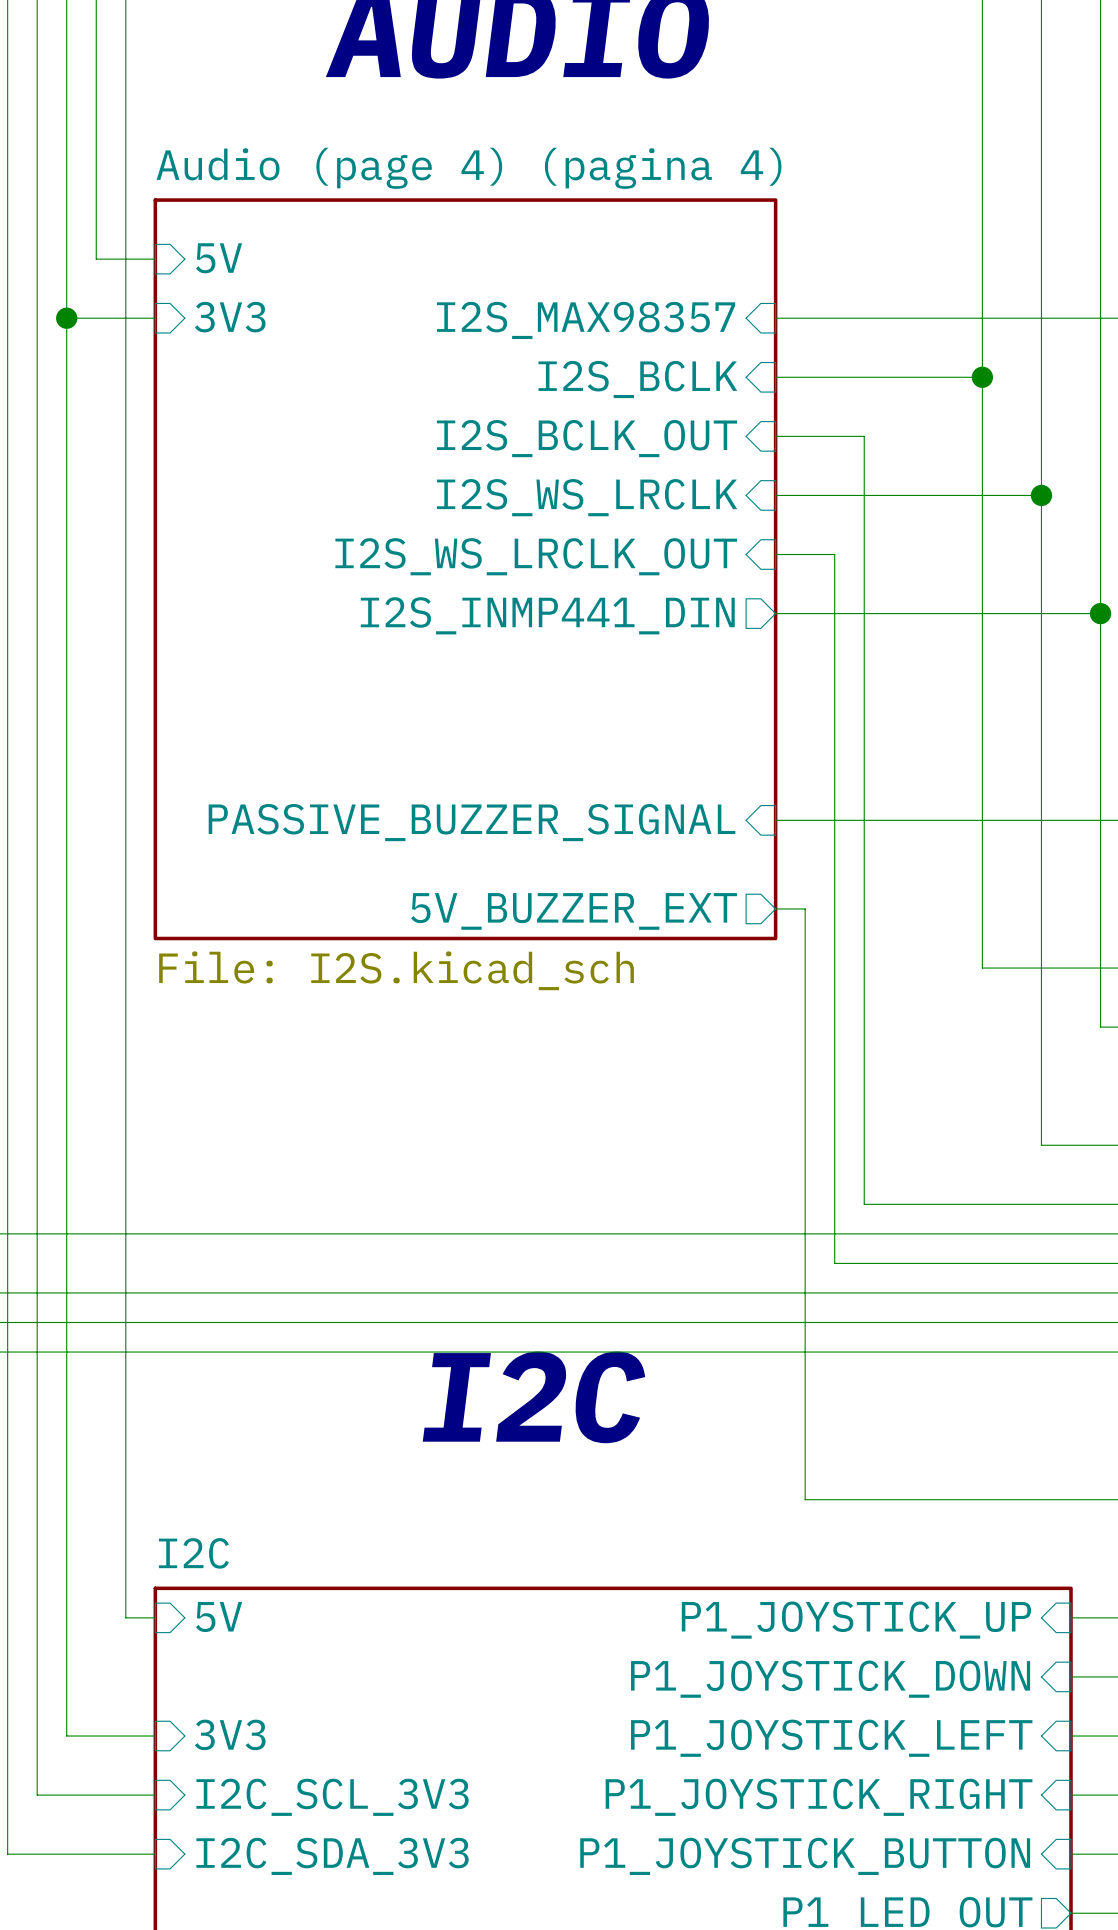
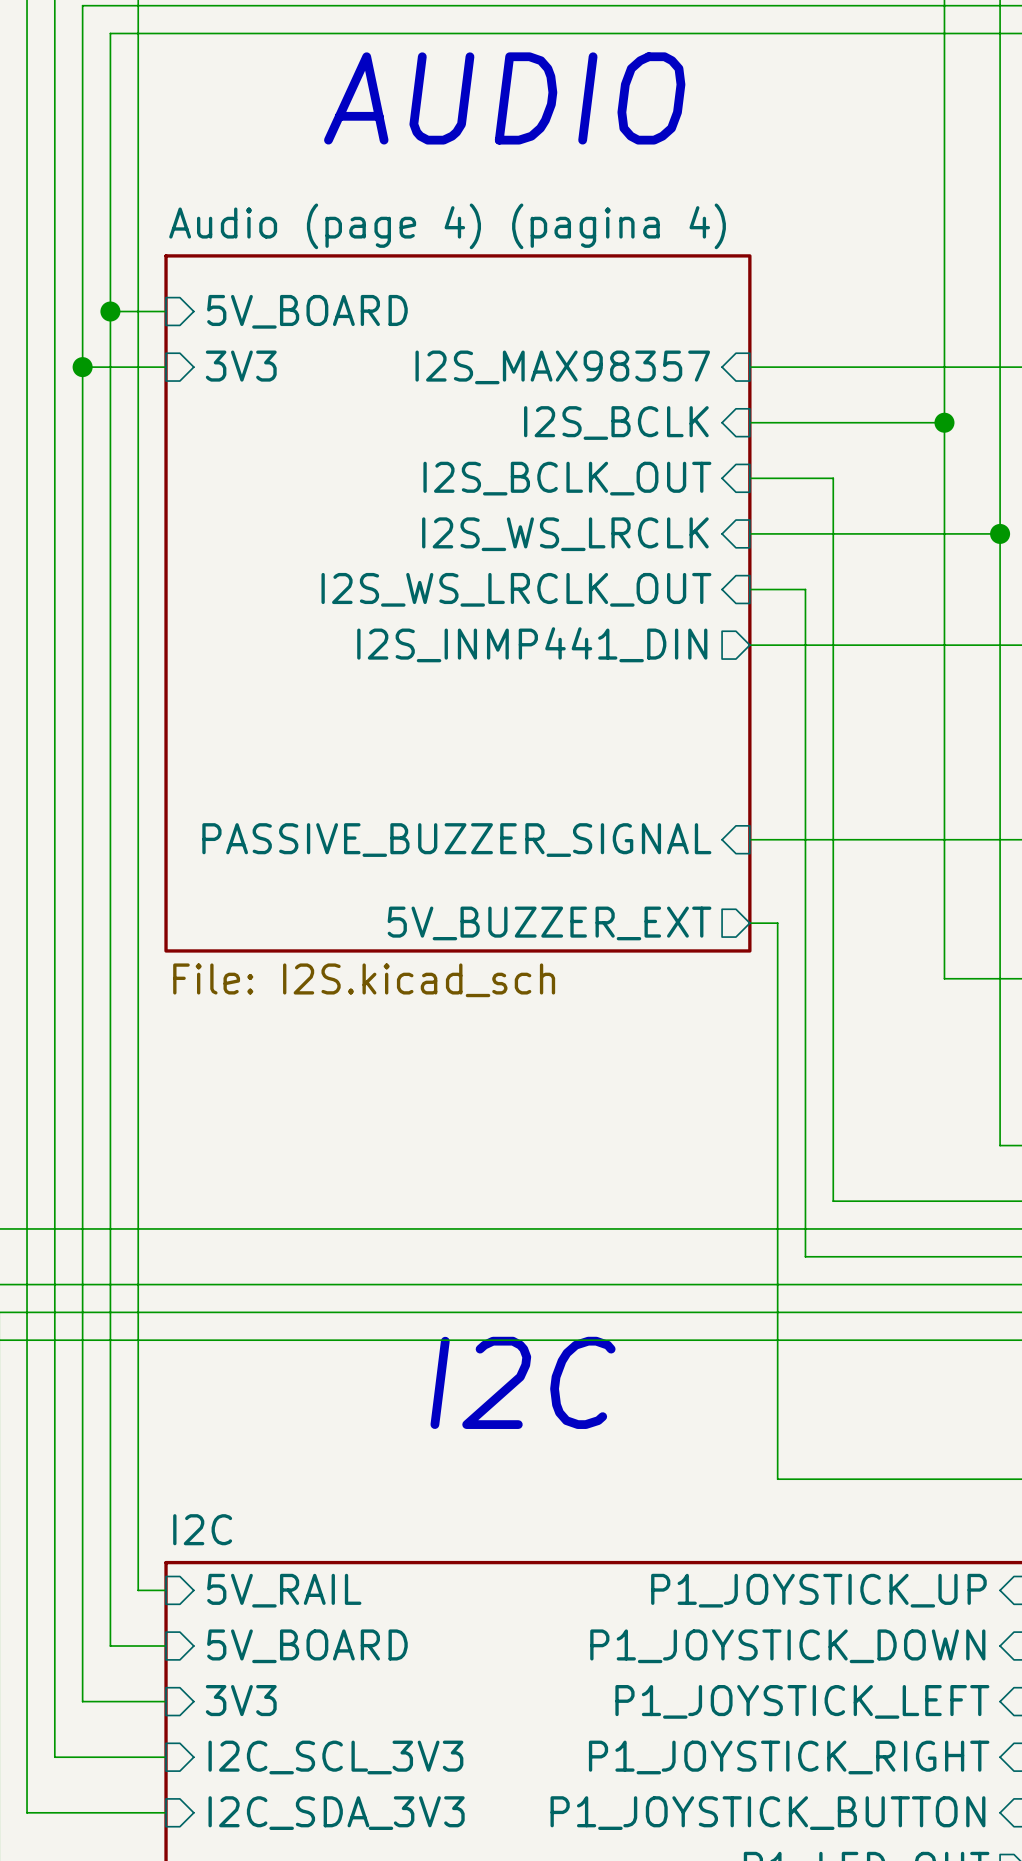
sheet pin: 5V (219, 258) -> 5V_BOARD (307, 311)
wire: none -> (110, 311) (110, 1646) (166, 1646)
junction: none -> (110, 311)
sheet pin: 5V (219, 1617) -> 5V_RAIL (284, 1590)
sheet pin: none -> 5V_BOARD (307, 1646)

